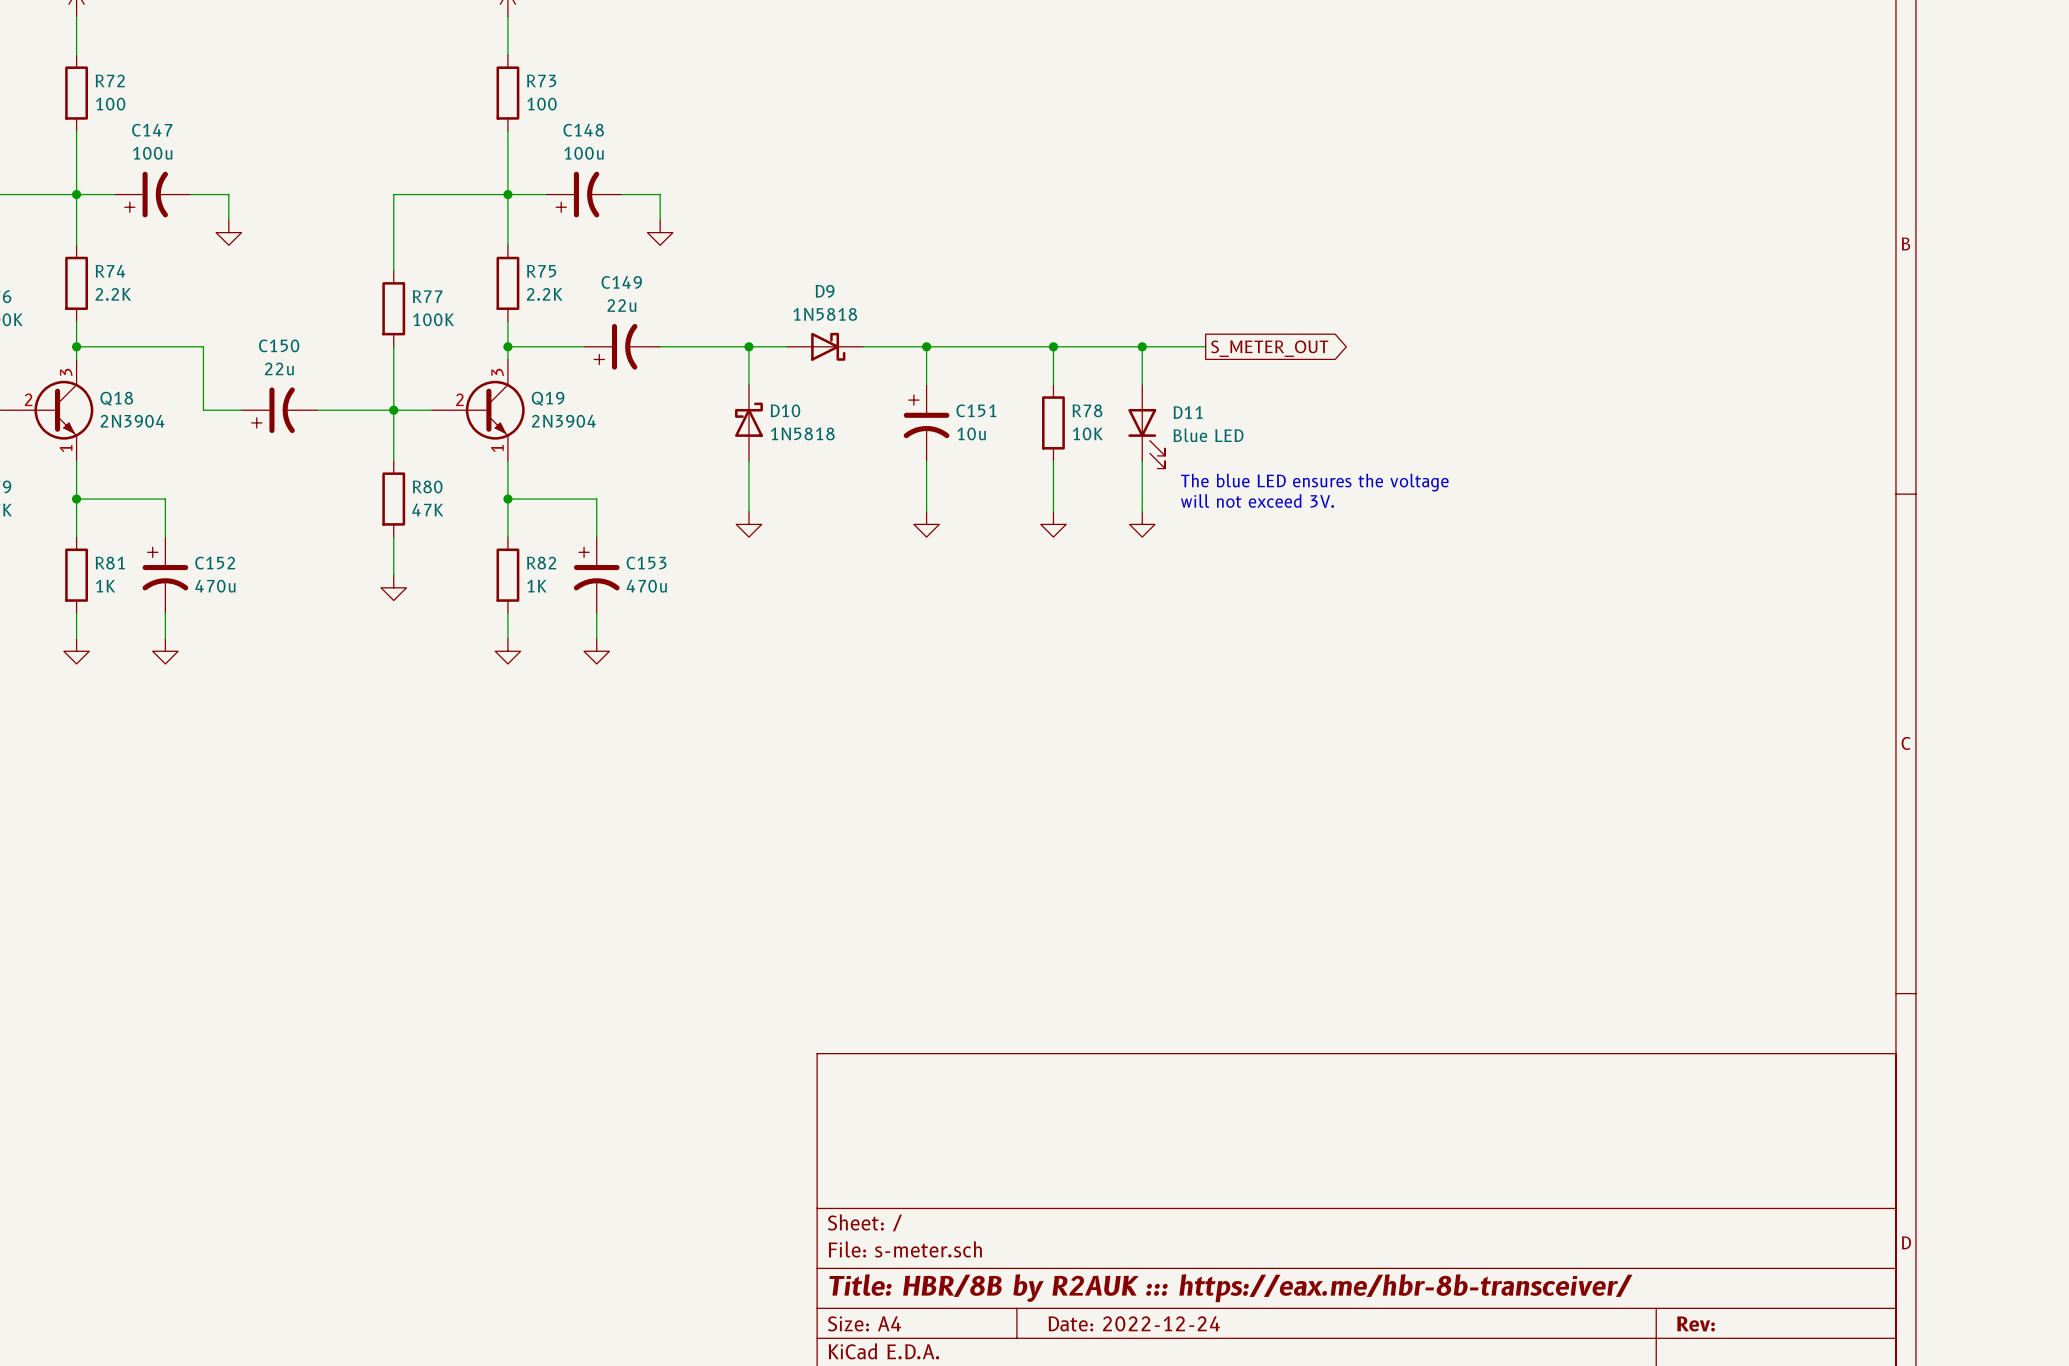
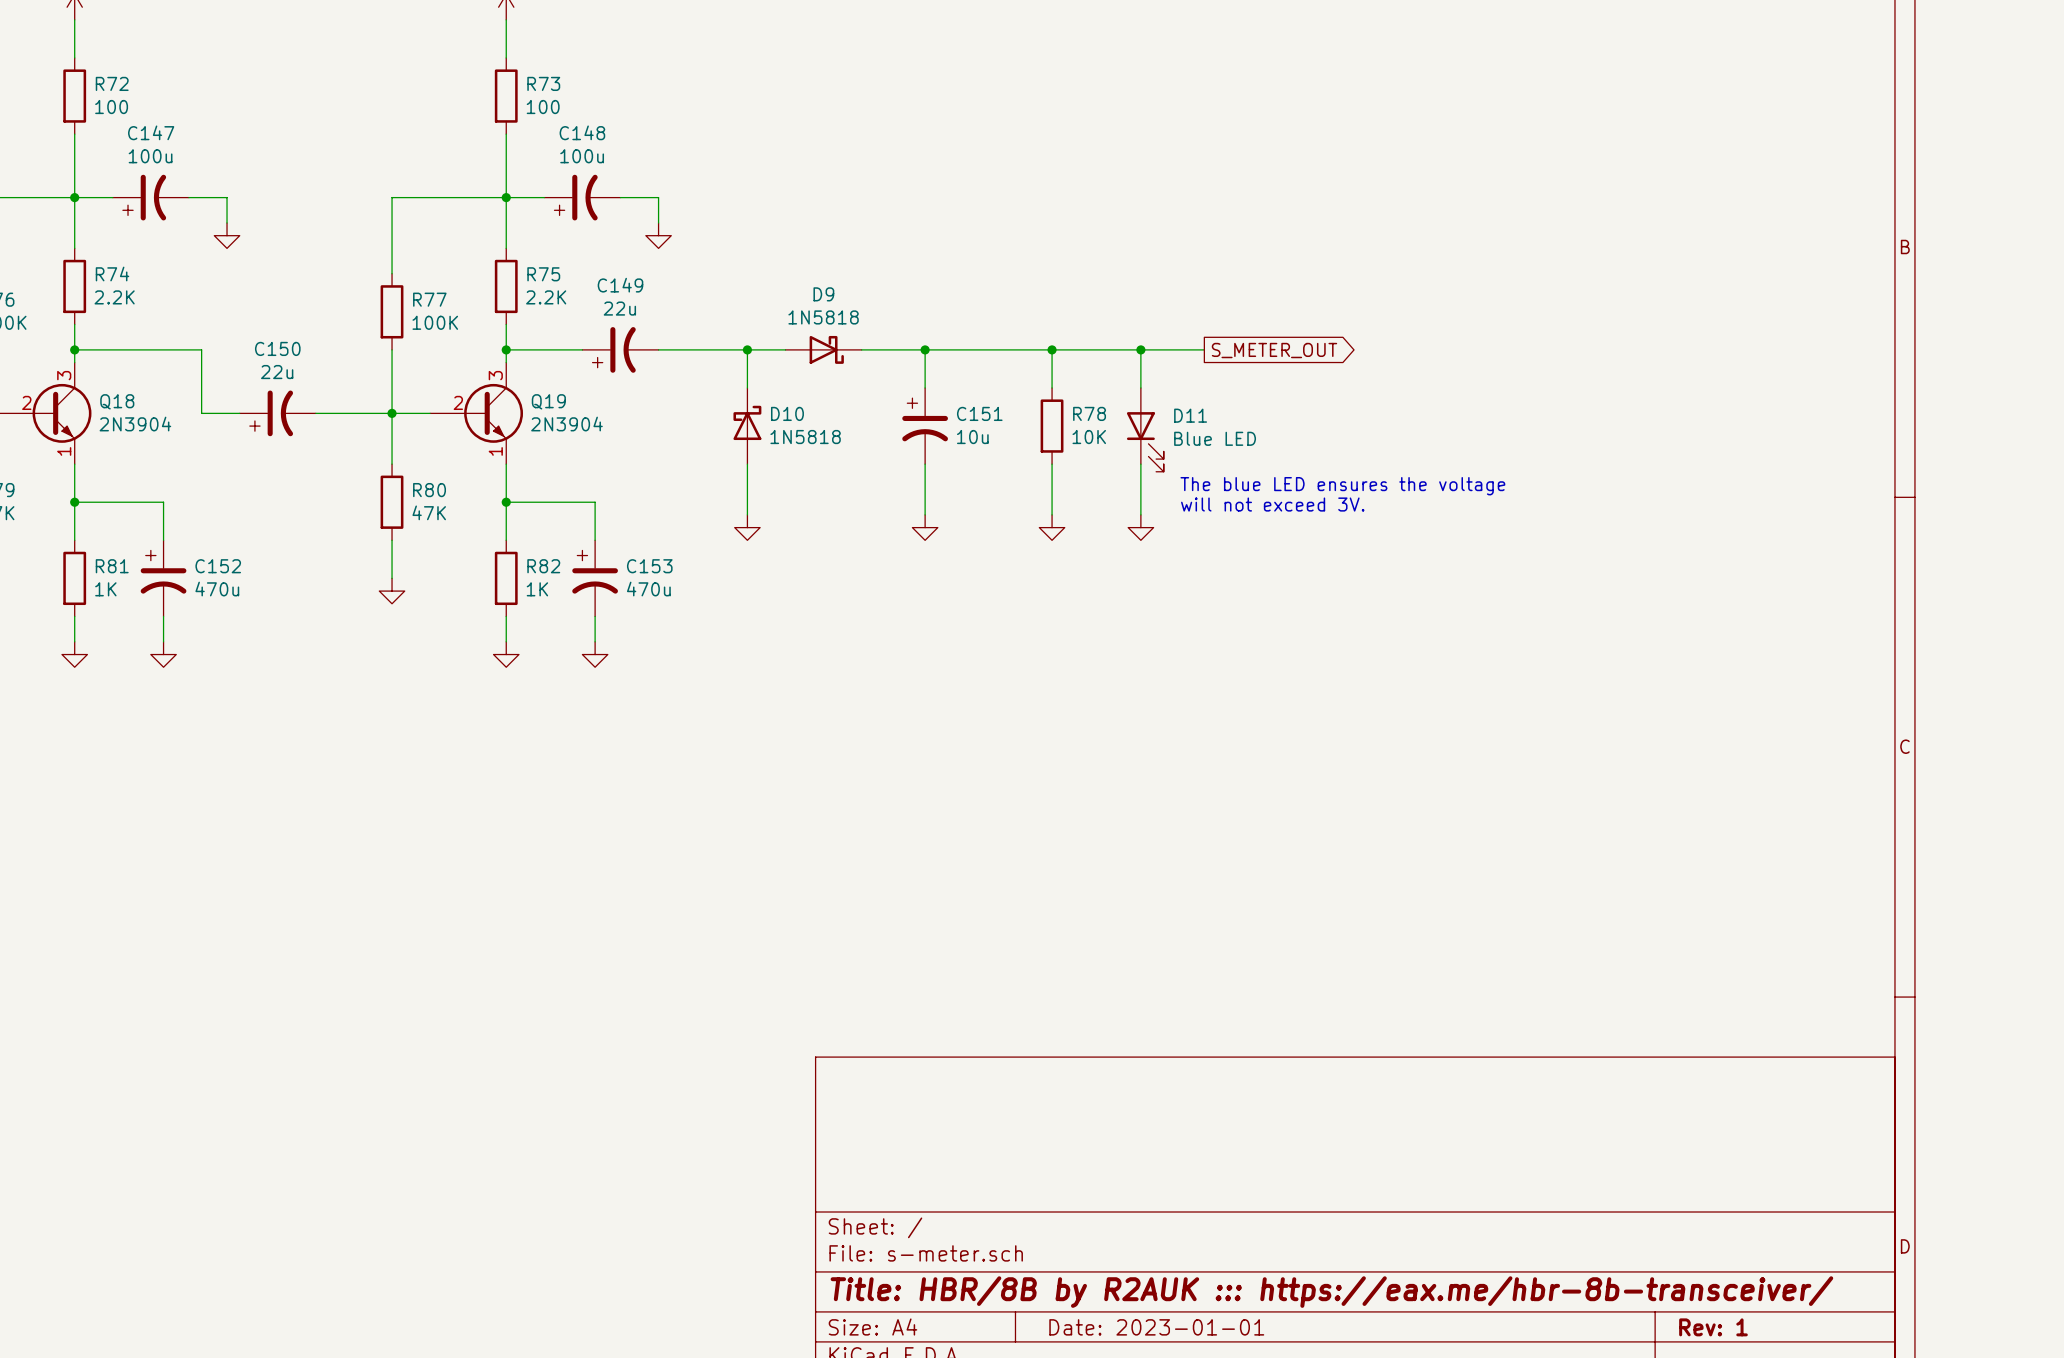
title block: Date: 2022-12-24 (1134, 1323) -> Date: 2023-01-01 (1156, 1327)
title block: Rev: (1695, 1323) -> Rev: 1 (1713, 1327)

